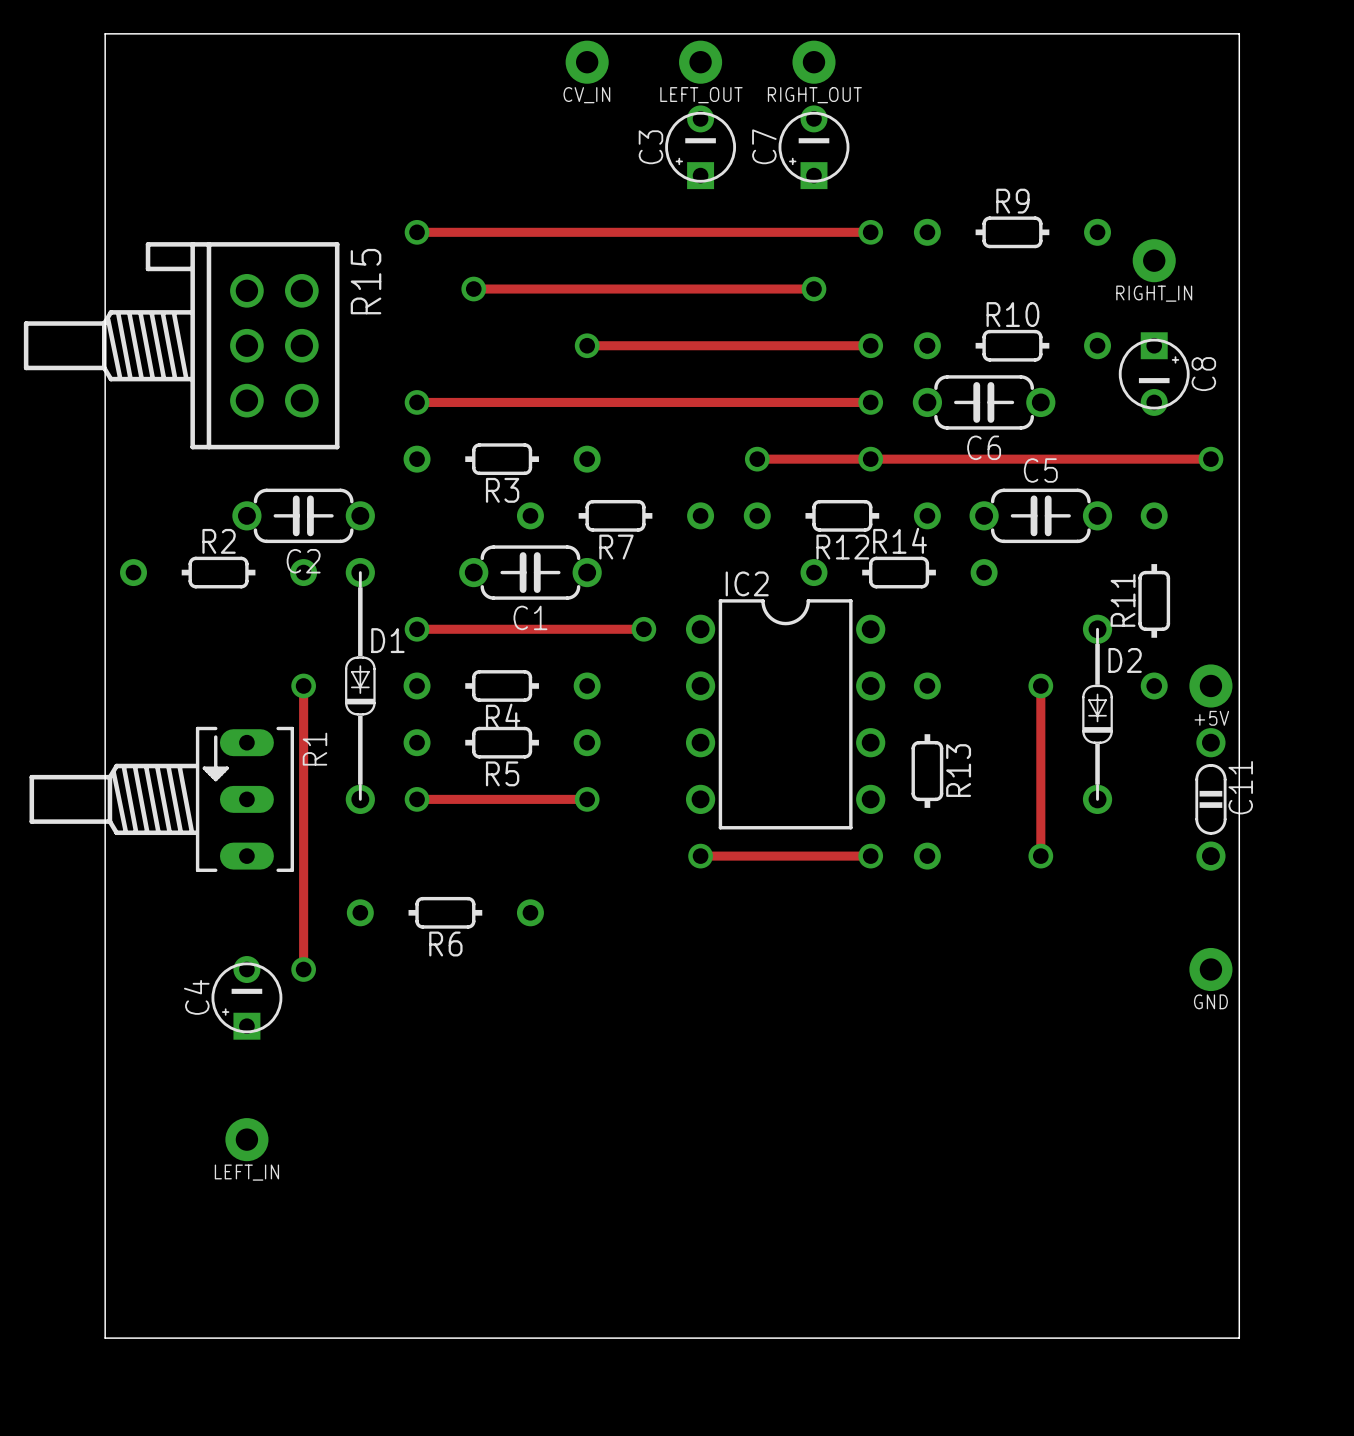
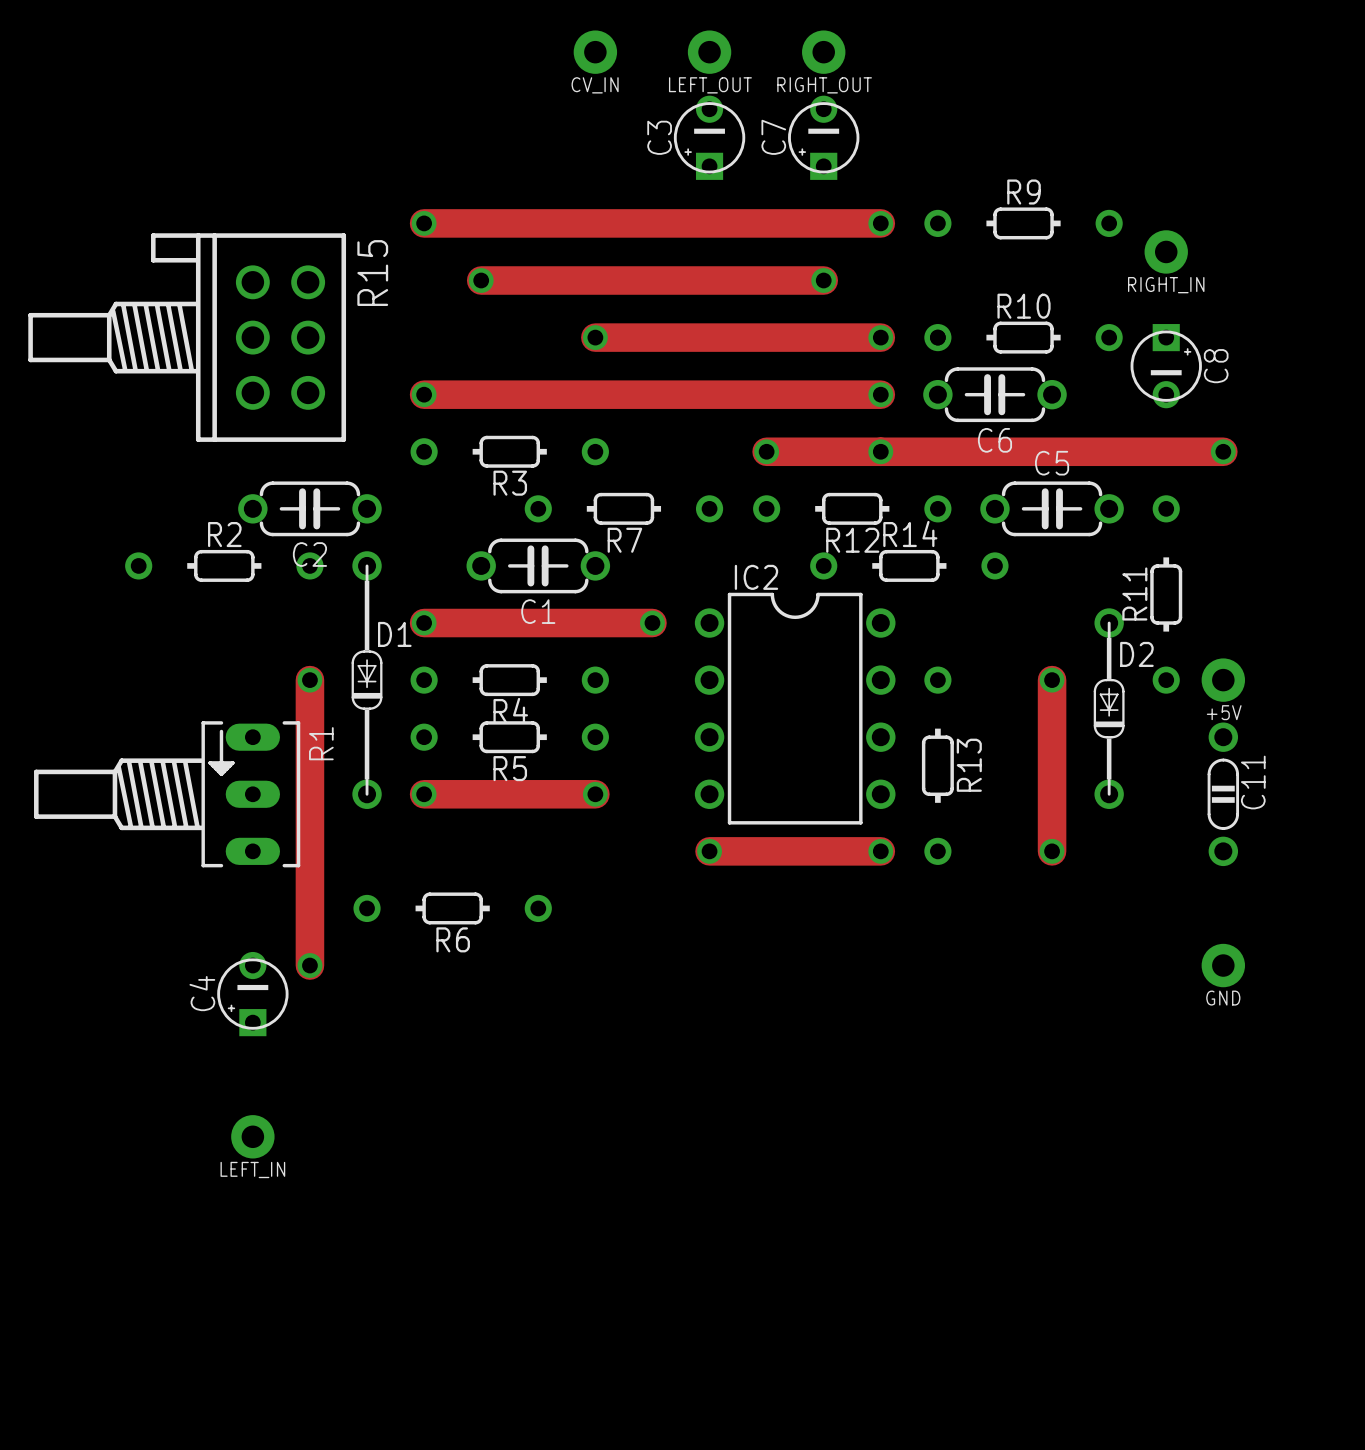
board edge: (105, 33) (1239, 33) (1239, 1338) (105, 1338) (105, 33) -> none
track width: thin (417, 232) (870, 232) -> thick (424, 223) (880, 223)
track width: thin (473, 289) (813, 289) -> thick (481, 280) (823, 280)
track width: thin (587, 345) (870, 345) -> thick (595, 337) (880, 337)
track width: thin (417, 402) (870, 402) -> thick (424, 394) (880, 394)
track width: thin (757, 459) (1210, 459) -> thick (766, 451) (1223, 451)
track width: thin (417, 629) (643, 629) -> thick (424, 623) (652, 623)
track width: thin (303, 685) (303, 969) -> thick (309, 680) (309, 965)
track width: thin (1040, 685) (1040, 856) -> thick (1052, 680) (1052, 851)
track width: thin (417, 799) (587, 799) -> thick (424, 794) (595, 794)
track width: thin (700, 856) (870, 856) -> thick (709, 851) (880, 851)

